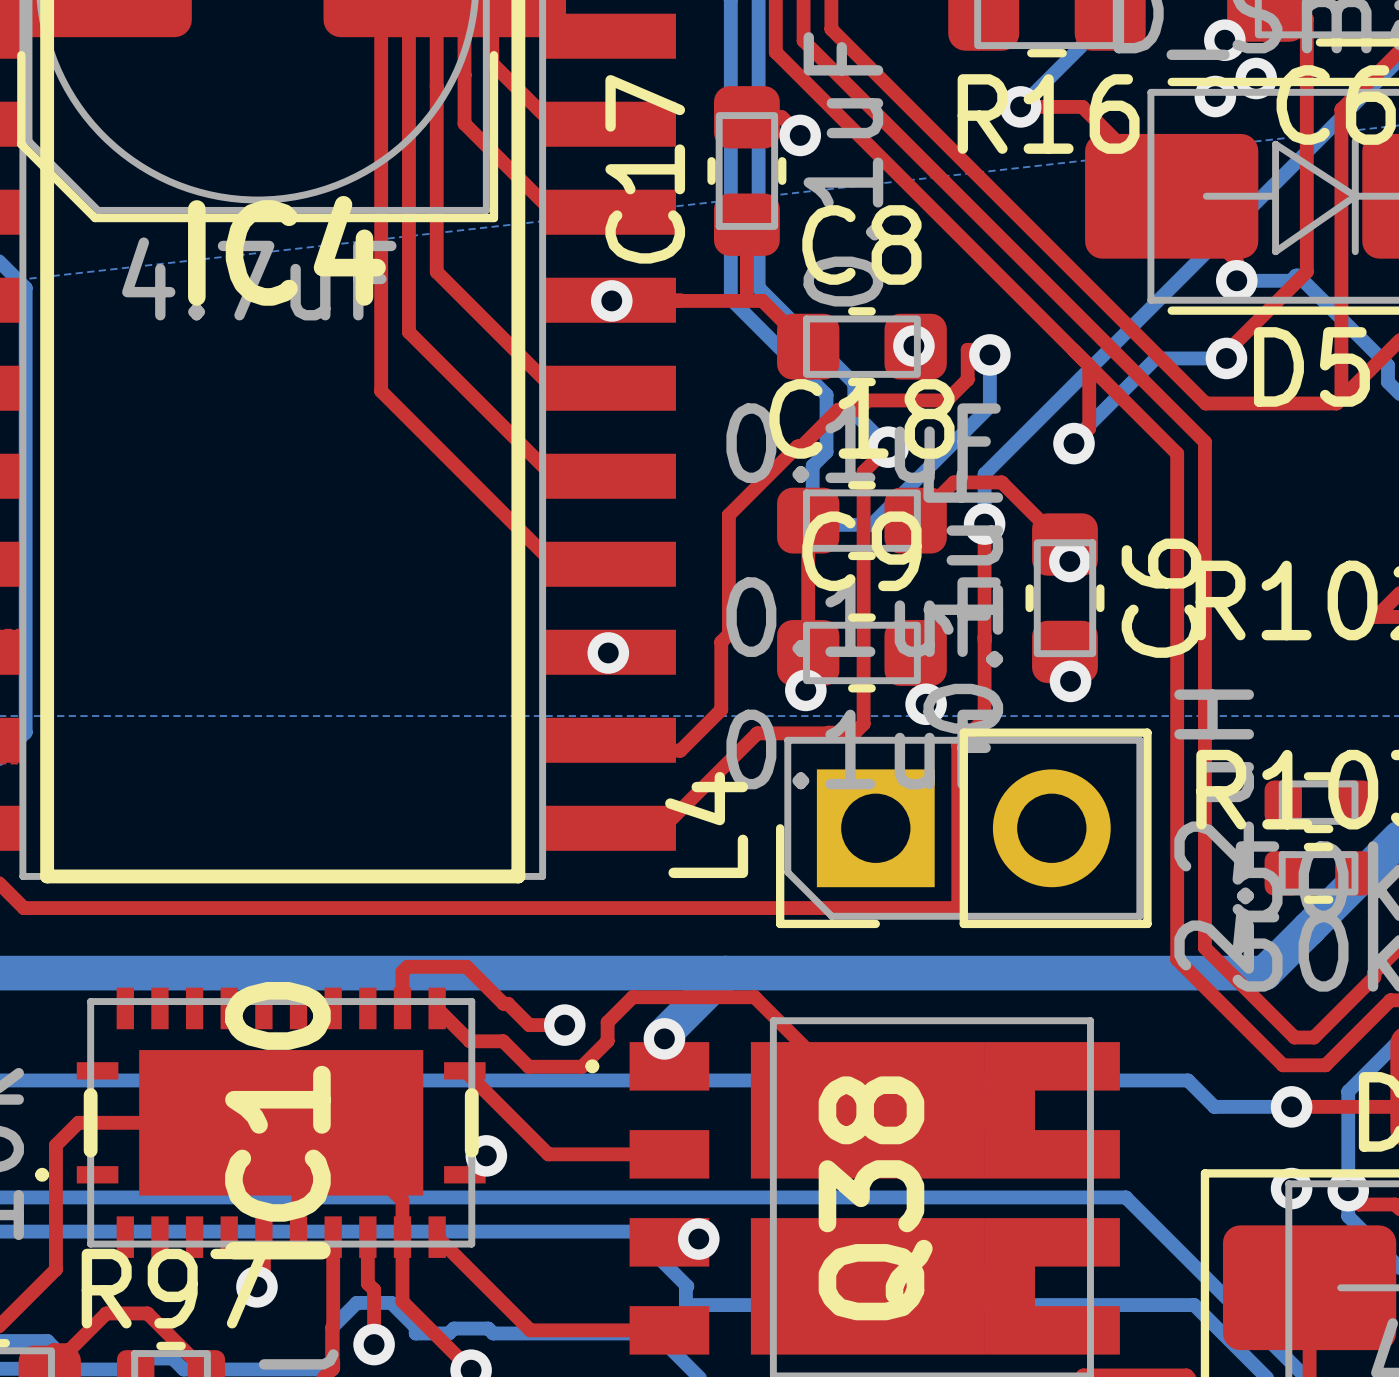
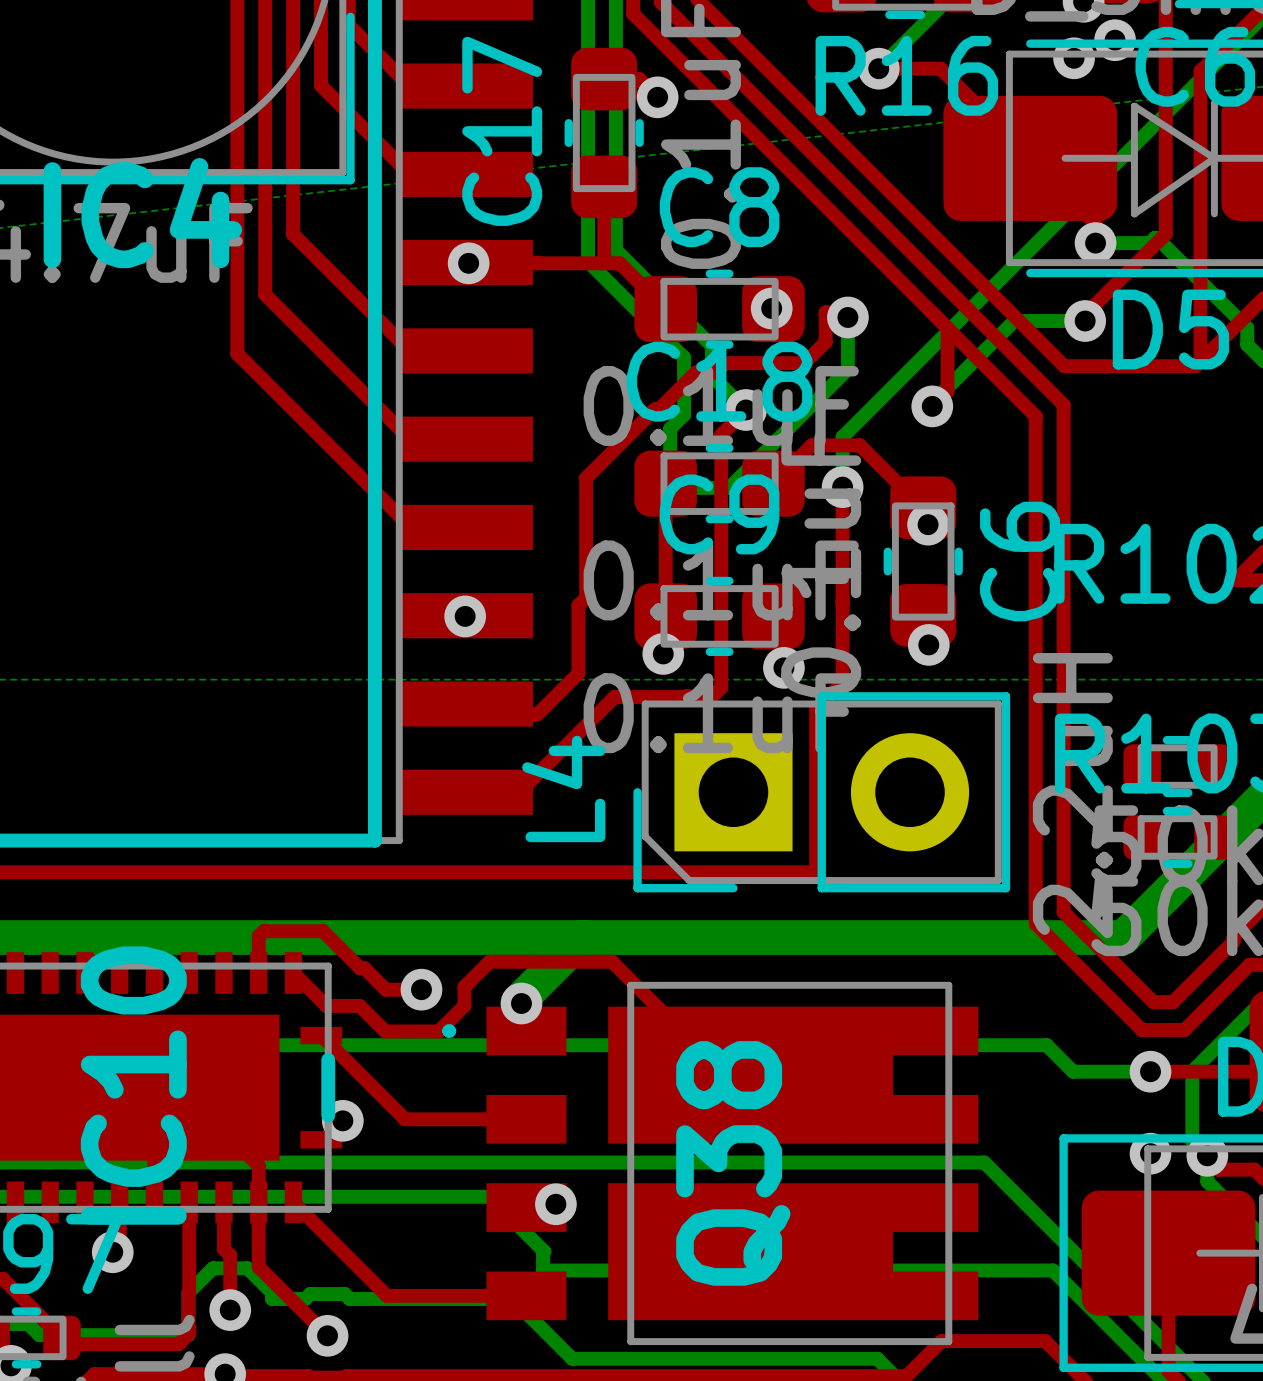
bottom track: (1348, 1091) (1348, 1190) -> (1207, 1056) (1192, 1071) (1192, 1140) (1207, 1155)

